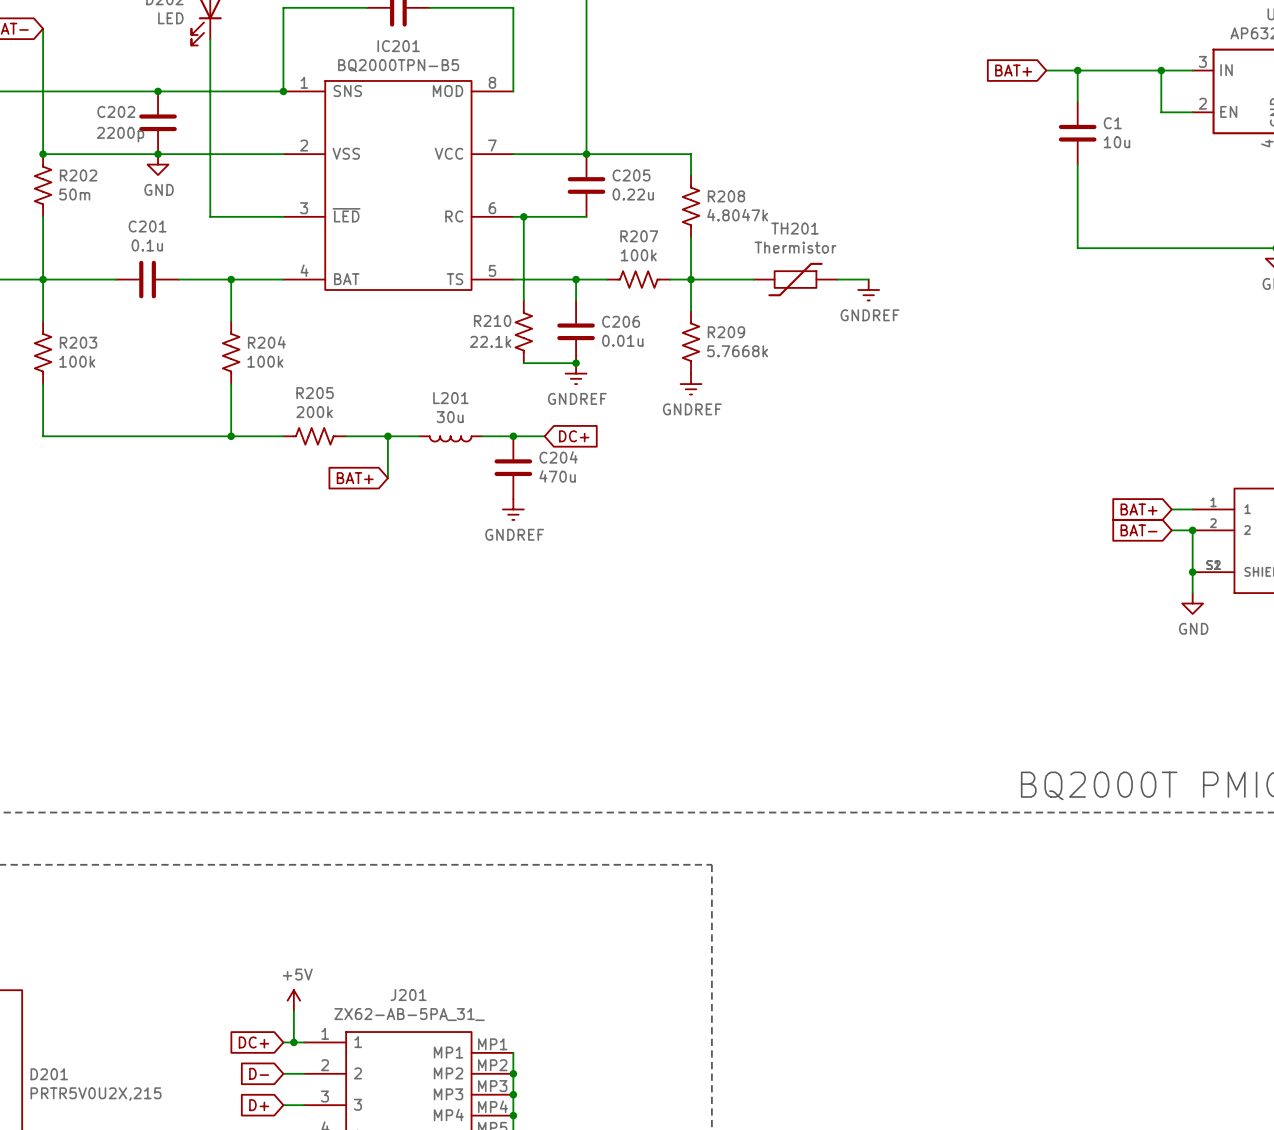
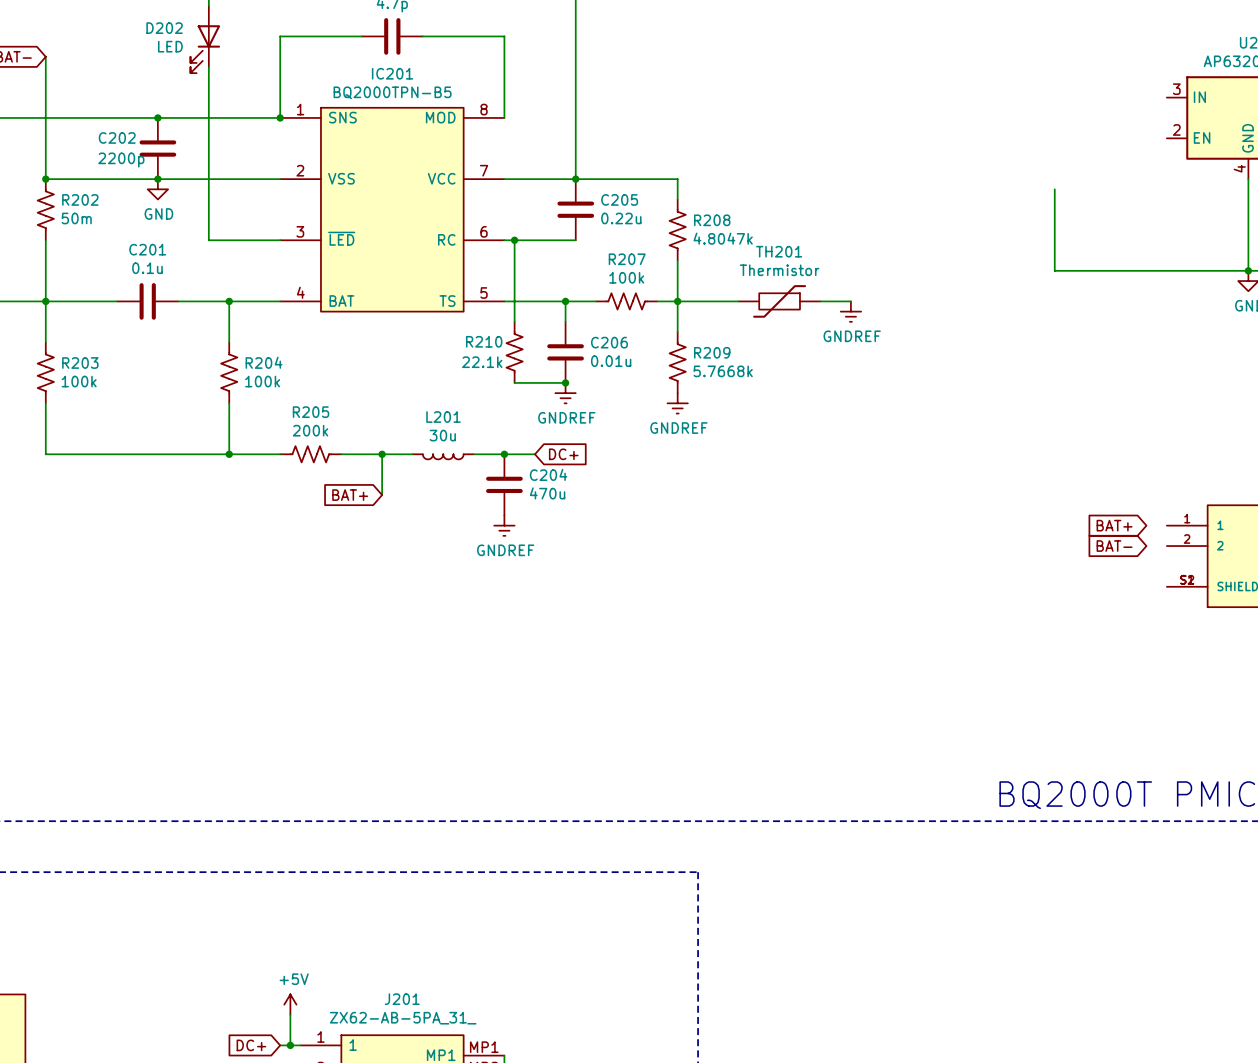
global label: BAT+ (1013, 70) -> none
wire: (1046, 70) (1192, 70) -> none
wire: (1077, 70) (1077, 101) -> none
junction: (1077, 70) -> none
wire: (1161, 70) (1161, 112) (1192, 112) -> none
junction: (1161, 70) -> none
C1: 10u (1077, 133) -> none
wire: (1171, 509) (1192, 509) -> none
wire: (1171, 530) (1192, 530) (1192, 593) -> none
junction: (1192, 530) -> none
junction: (1192, 572) -> none
power symbol: GND (1192, 603) -> none

